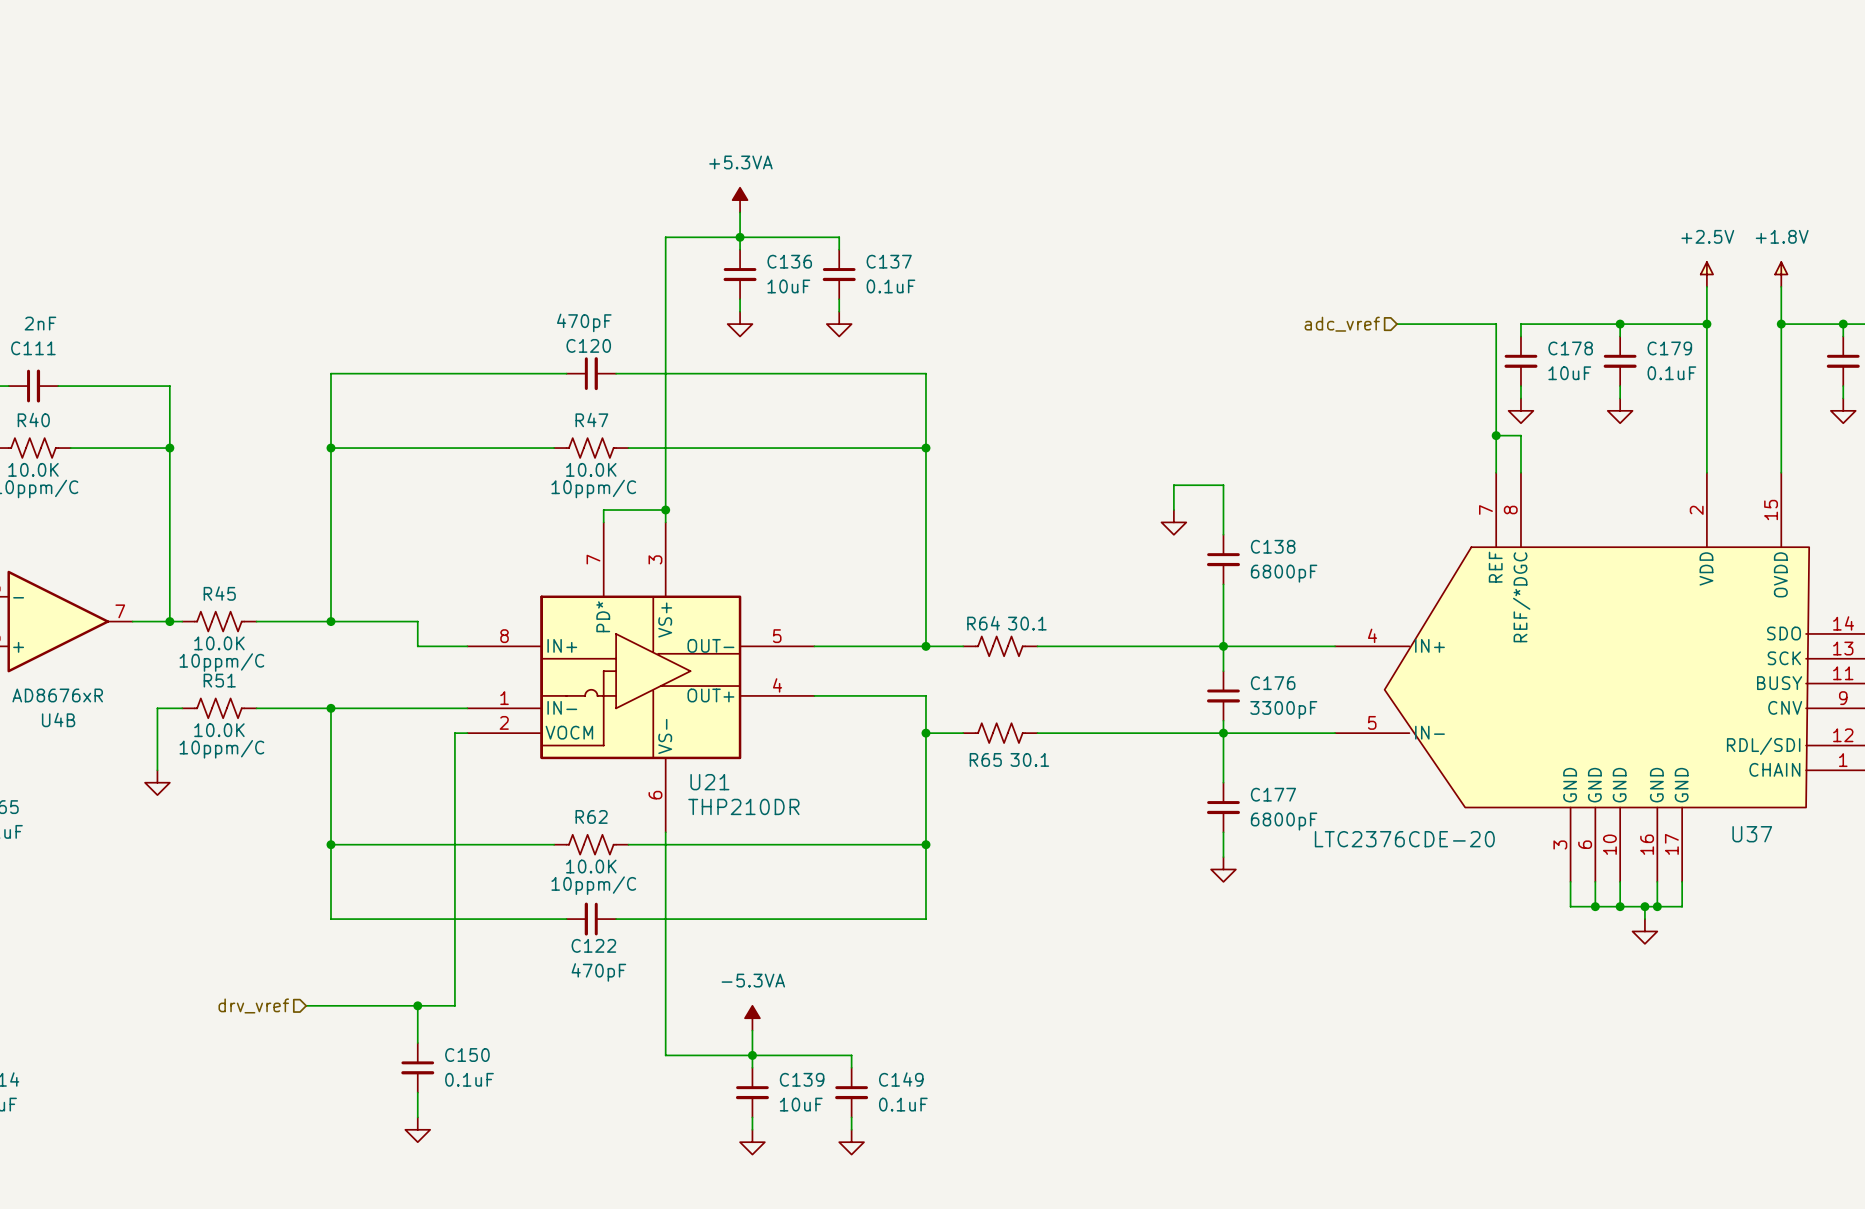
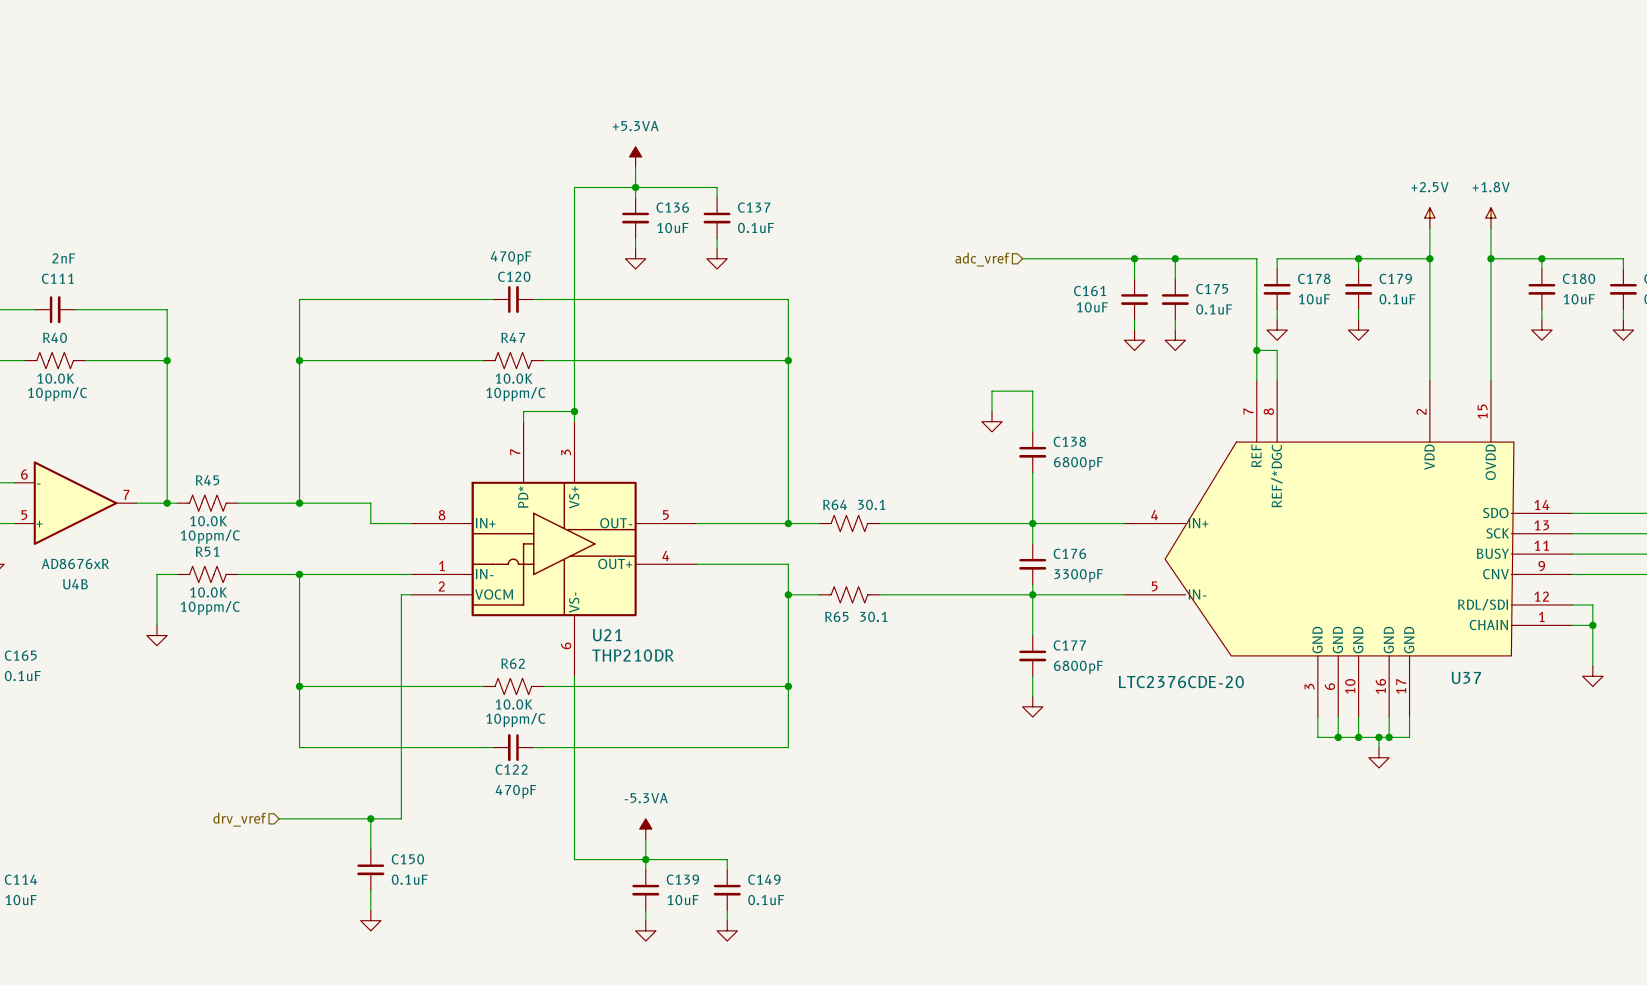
wire: none -> (1022, 258) (1175, 258) (1175, 279)
hierarchical label position: adc_vref (1342, 324) -> adc_vref (982, 259)
wire: none -> (1134, 258) (1134, 279)
junction: none -> (1134, 258)
junction: none -> (1175, 258)
C161: none -> 10uF (1134, 299)
C175: none -> 0.1uF (1175, 299)
wire: none -> (1134, 319) (1134, 330)
wire: none -> (1175, 319) (1175, 330)
power symbol: none -> (1134, 340)
power symbol: none -> (1175, 340)

